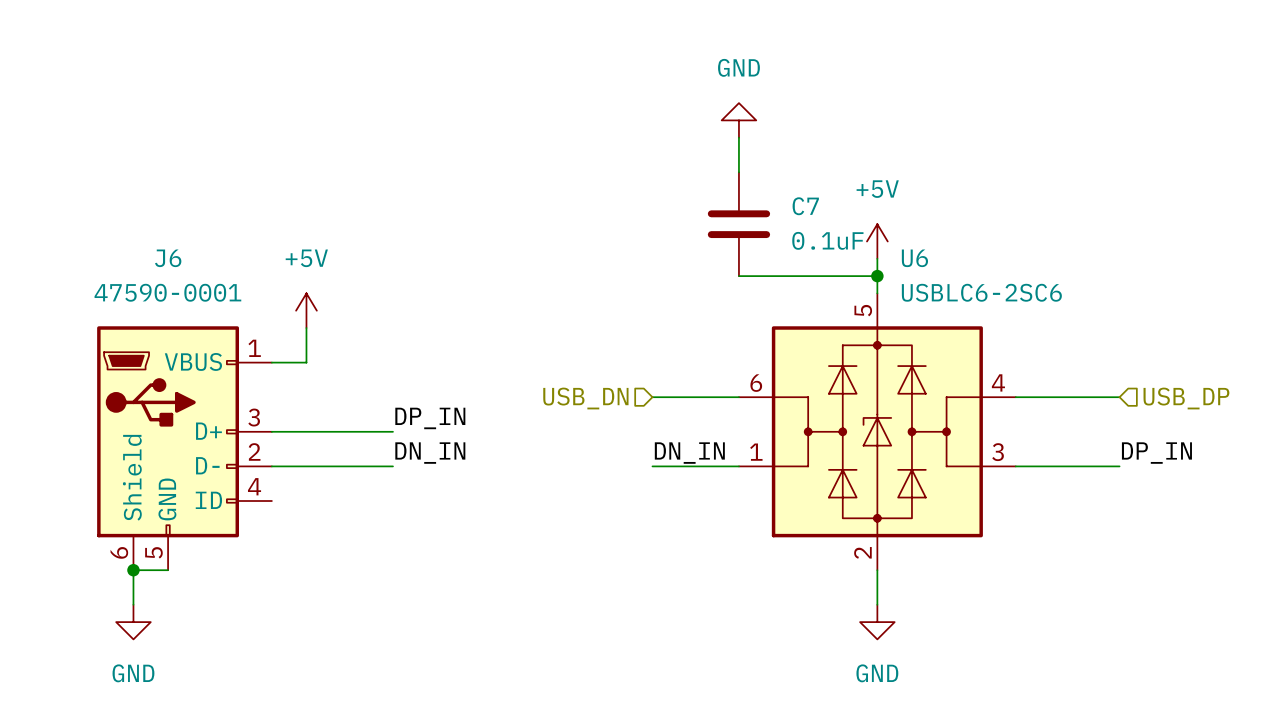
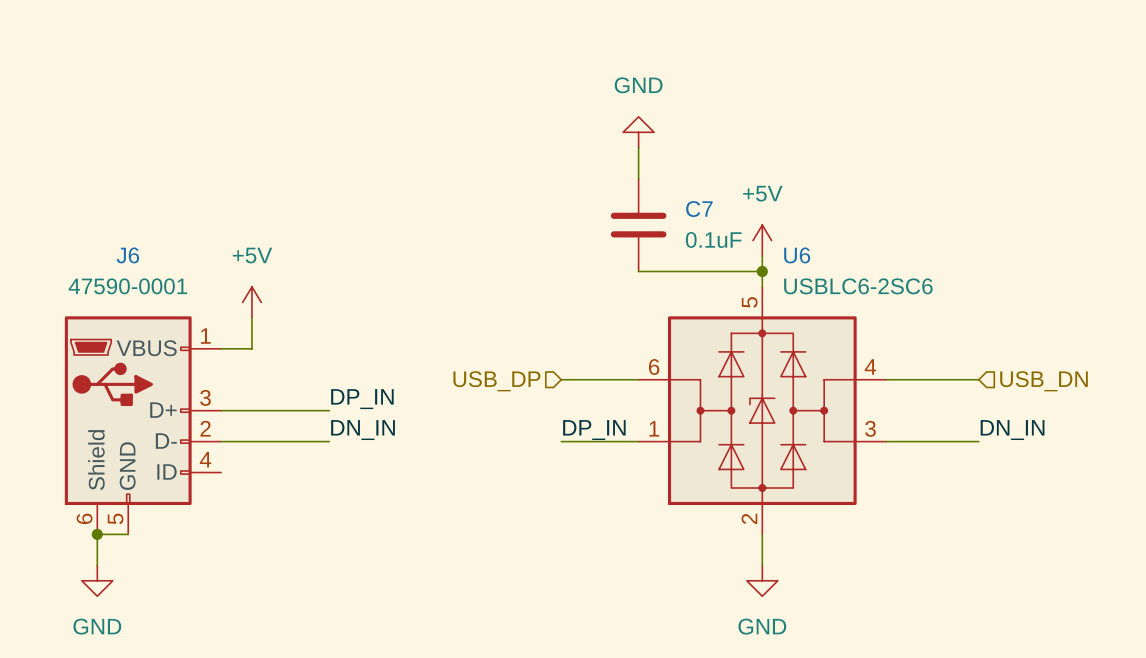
hierarchical label: USB_DN (585, 398) -> USB_DP (496, 381)
hierarchical label: USB_DP (1186, 398) -> USB_DN (1044, 381)
label: DN_IN (689, 453) -> DP_IN (594, 430)
label: DP_IN (1156, 453) -> DN_IN (1012, 430)

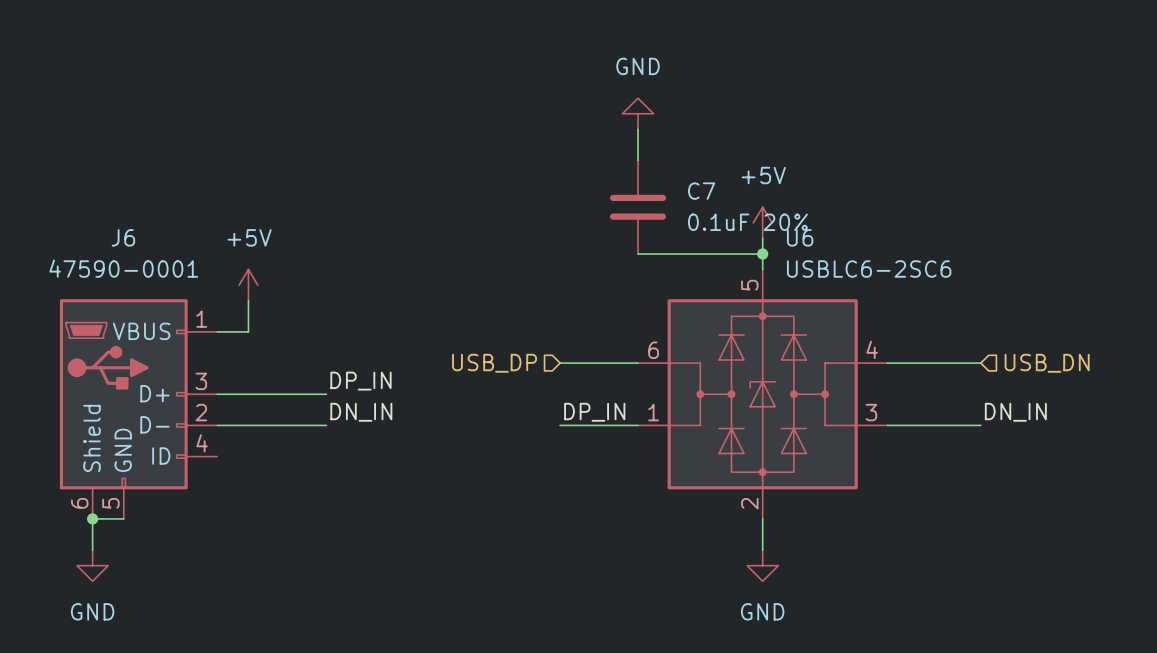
C7 value: 0.1uF (713, 239) -> 0.1uF 20% (747, 222)

